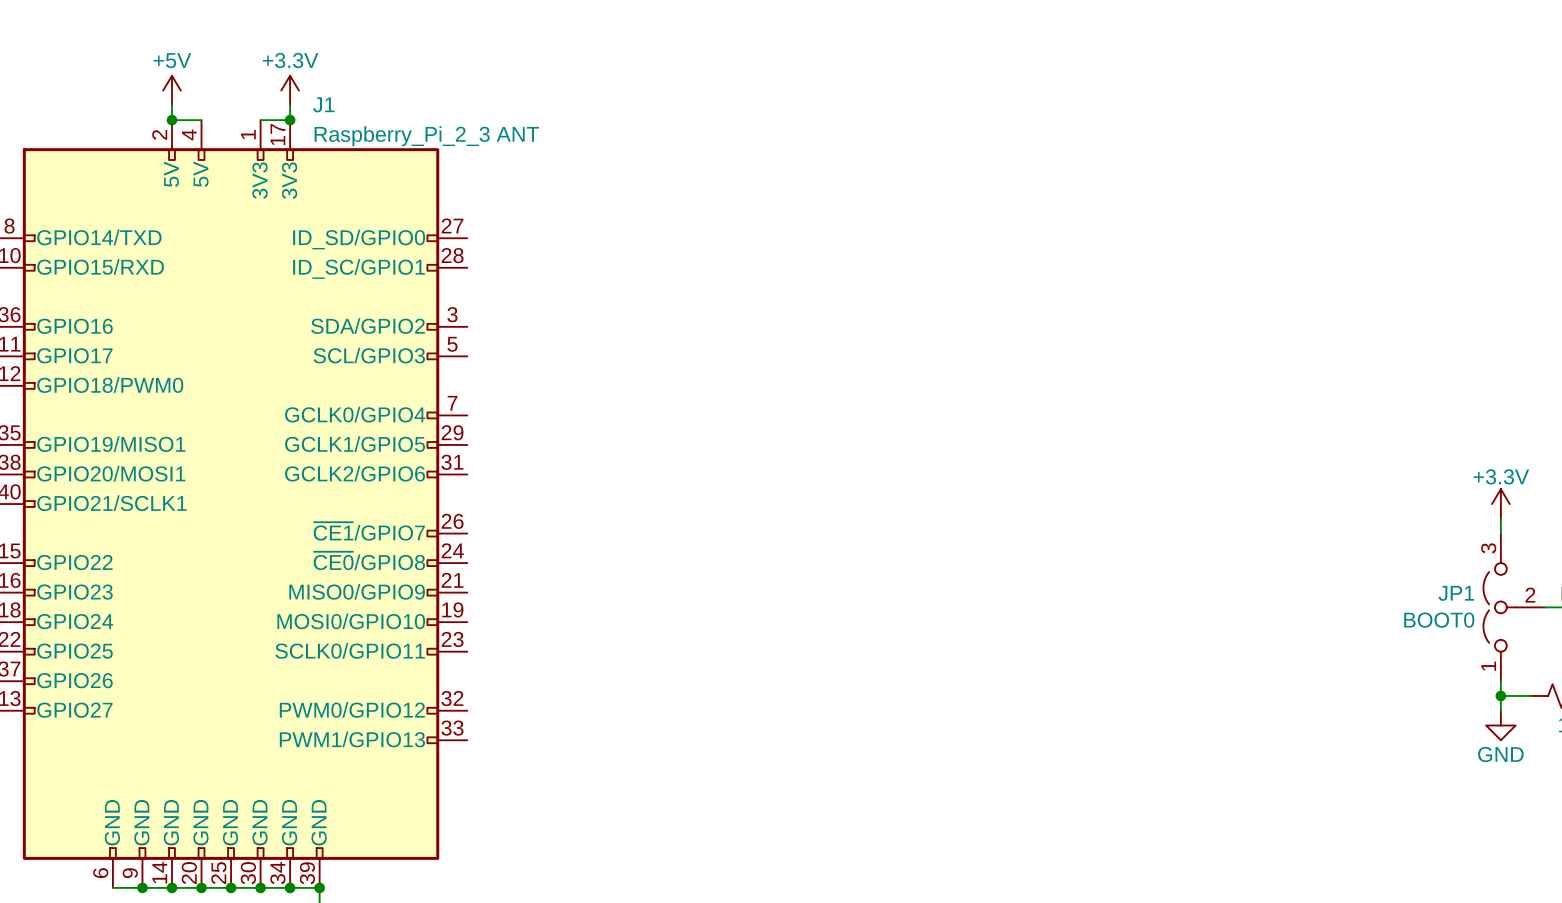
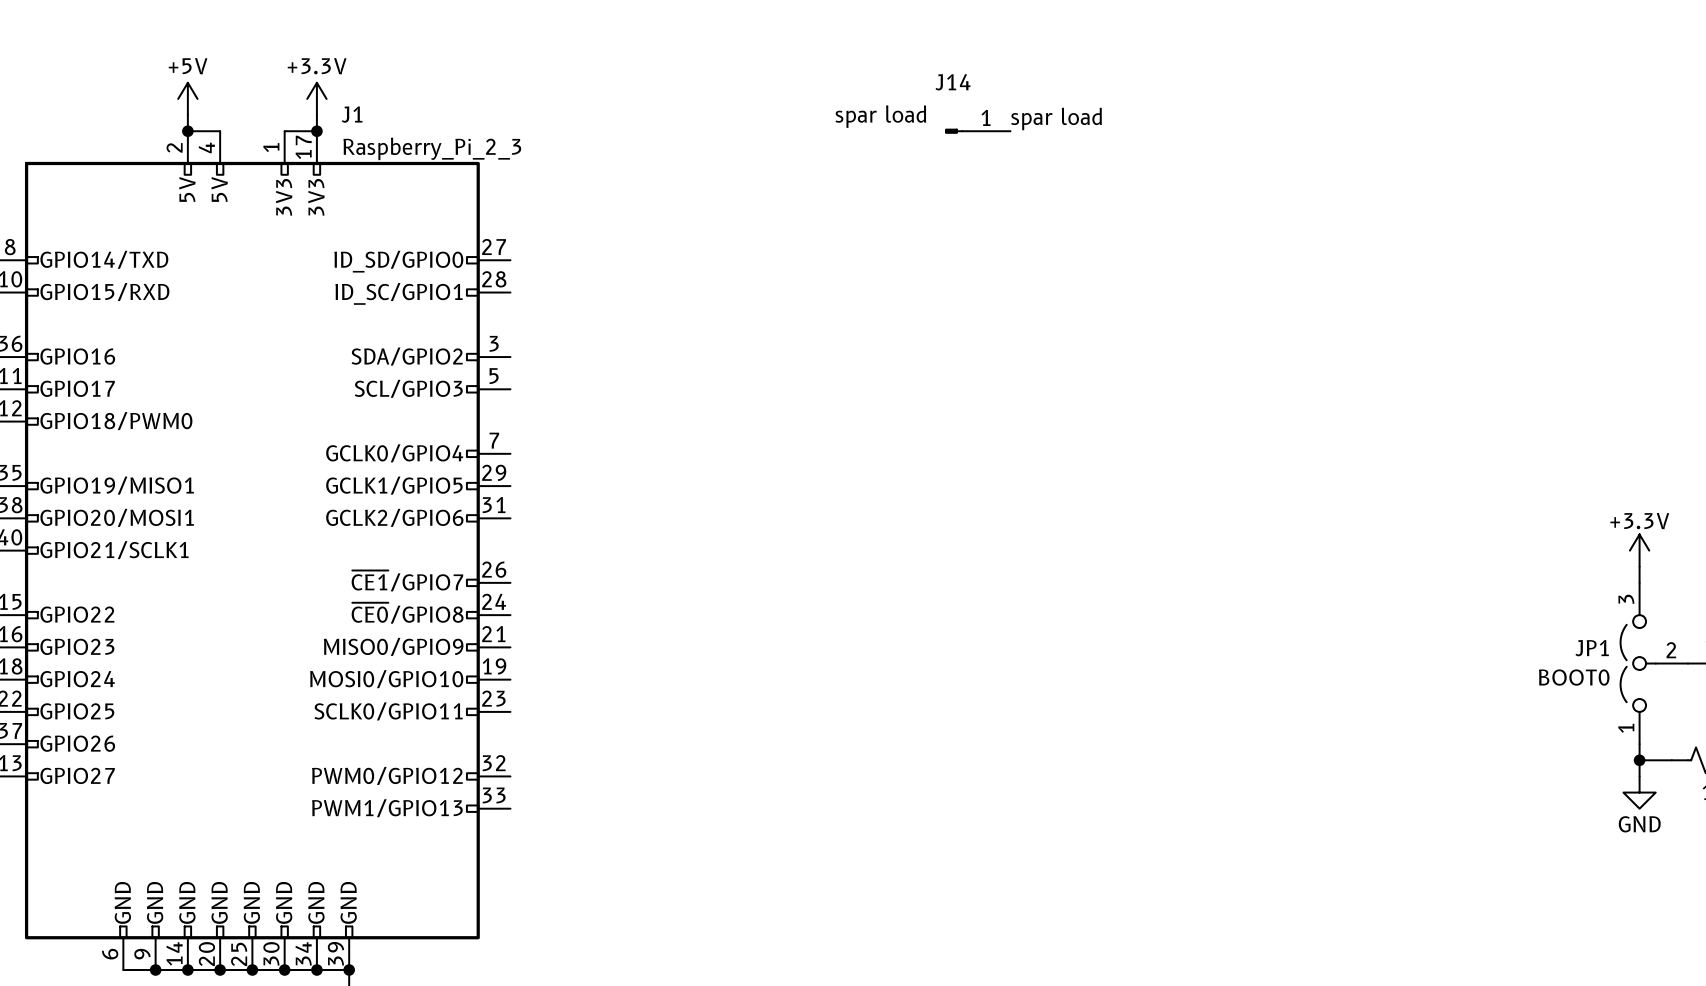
label: none -> spar load (1056, 118)
J14: none -> spar load (977, 131)
J1 value: Raspberry_Pi_2_3 ANT (426, 136) -> Raspberry_Pi_2_3 (432, 148)

